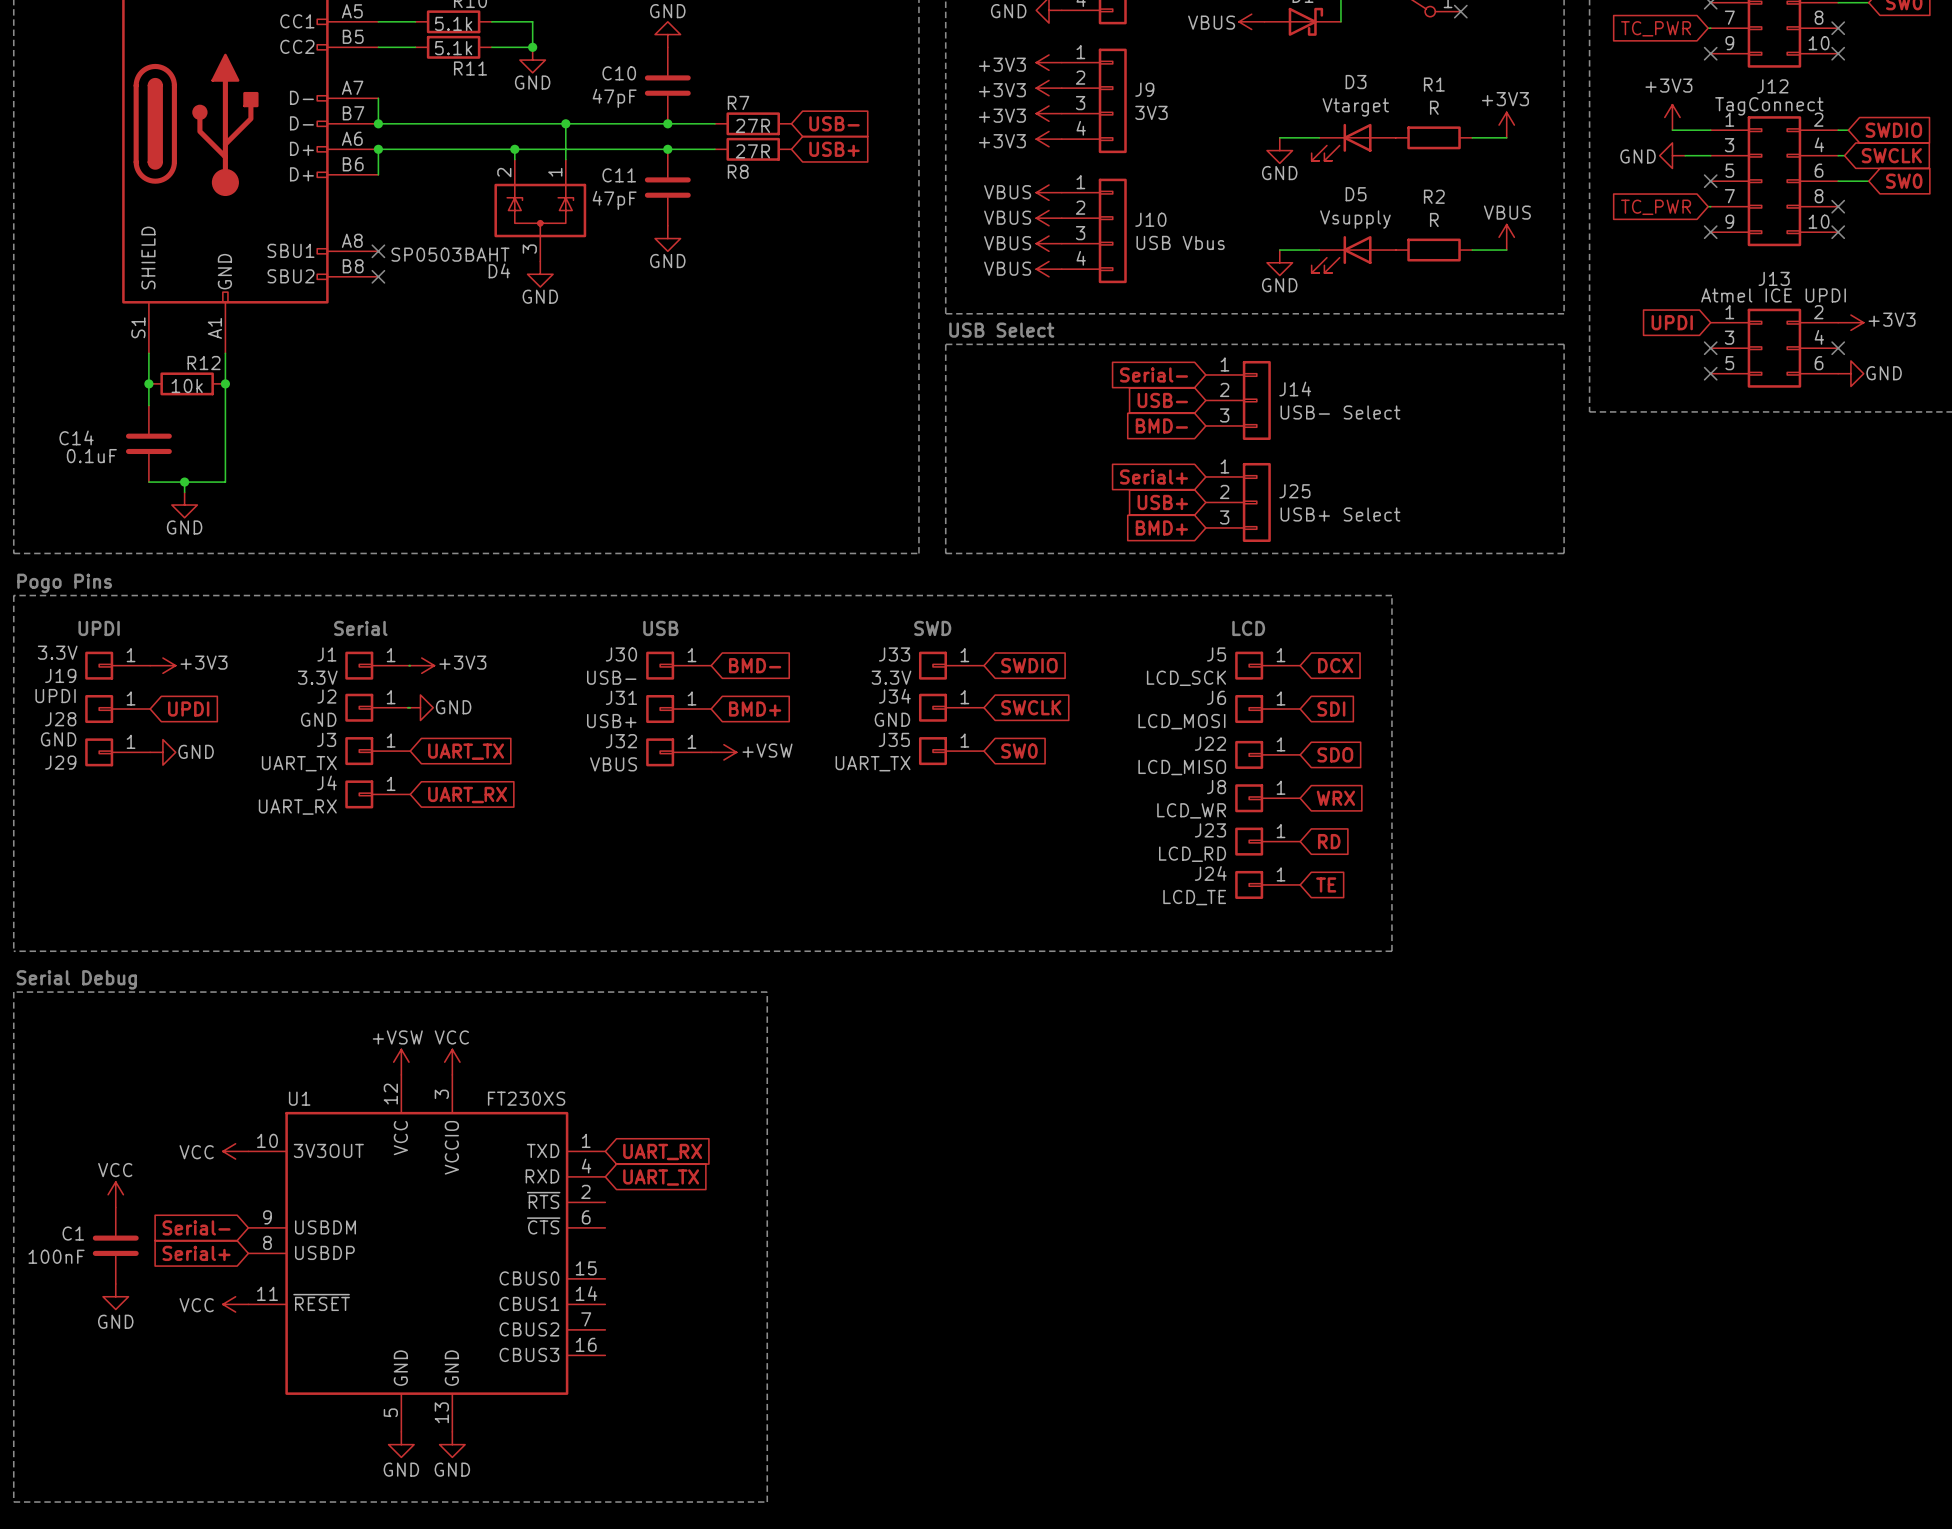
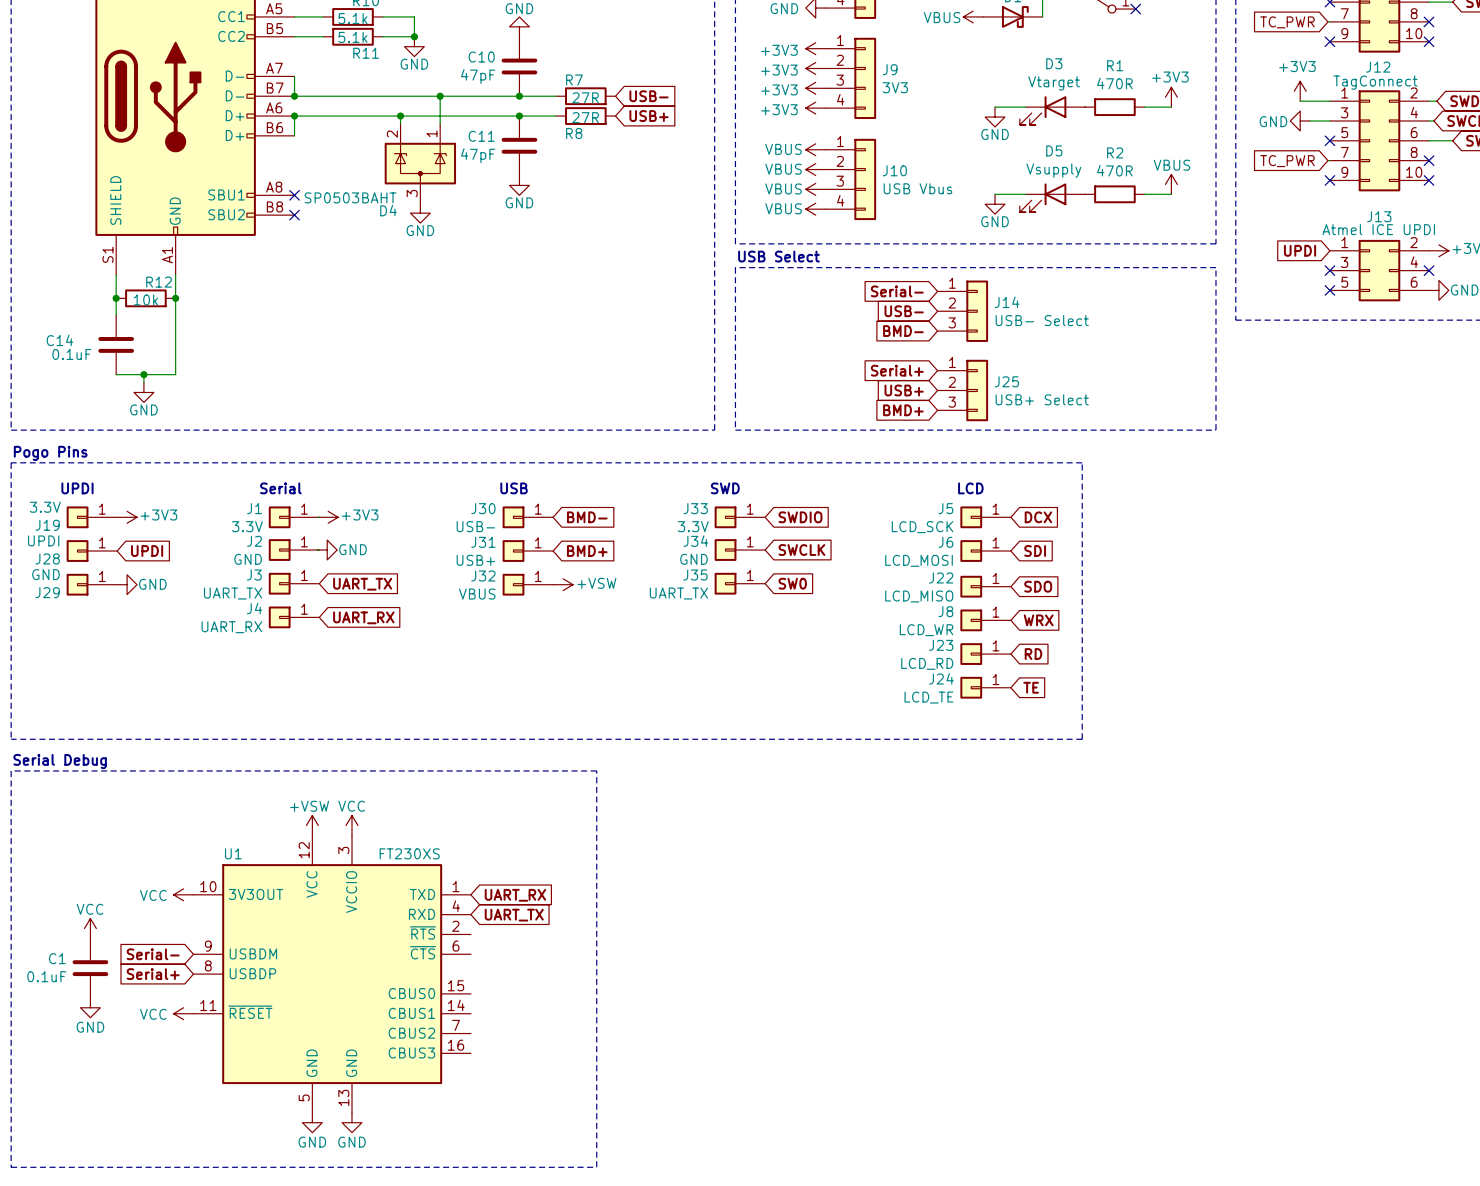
R1 value: R (1434, 107) -> 470R (1114, 83)
R2 value: R (1434, 219) -> 470R (1114, 170)
C1 value: 100nF (56, 1256) -> 0.1uF (46, 976)

